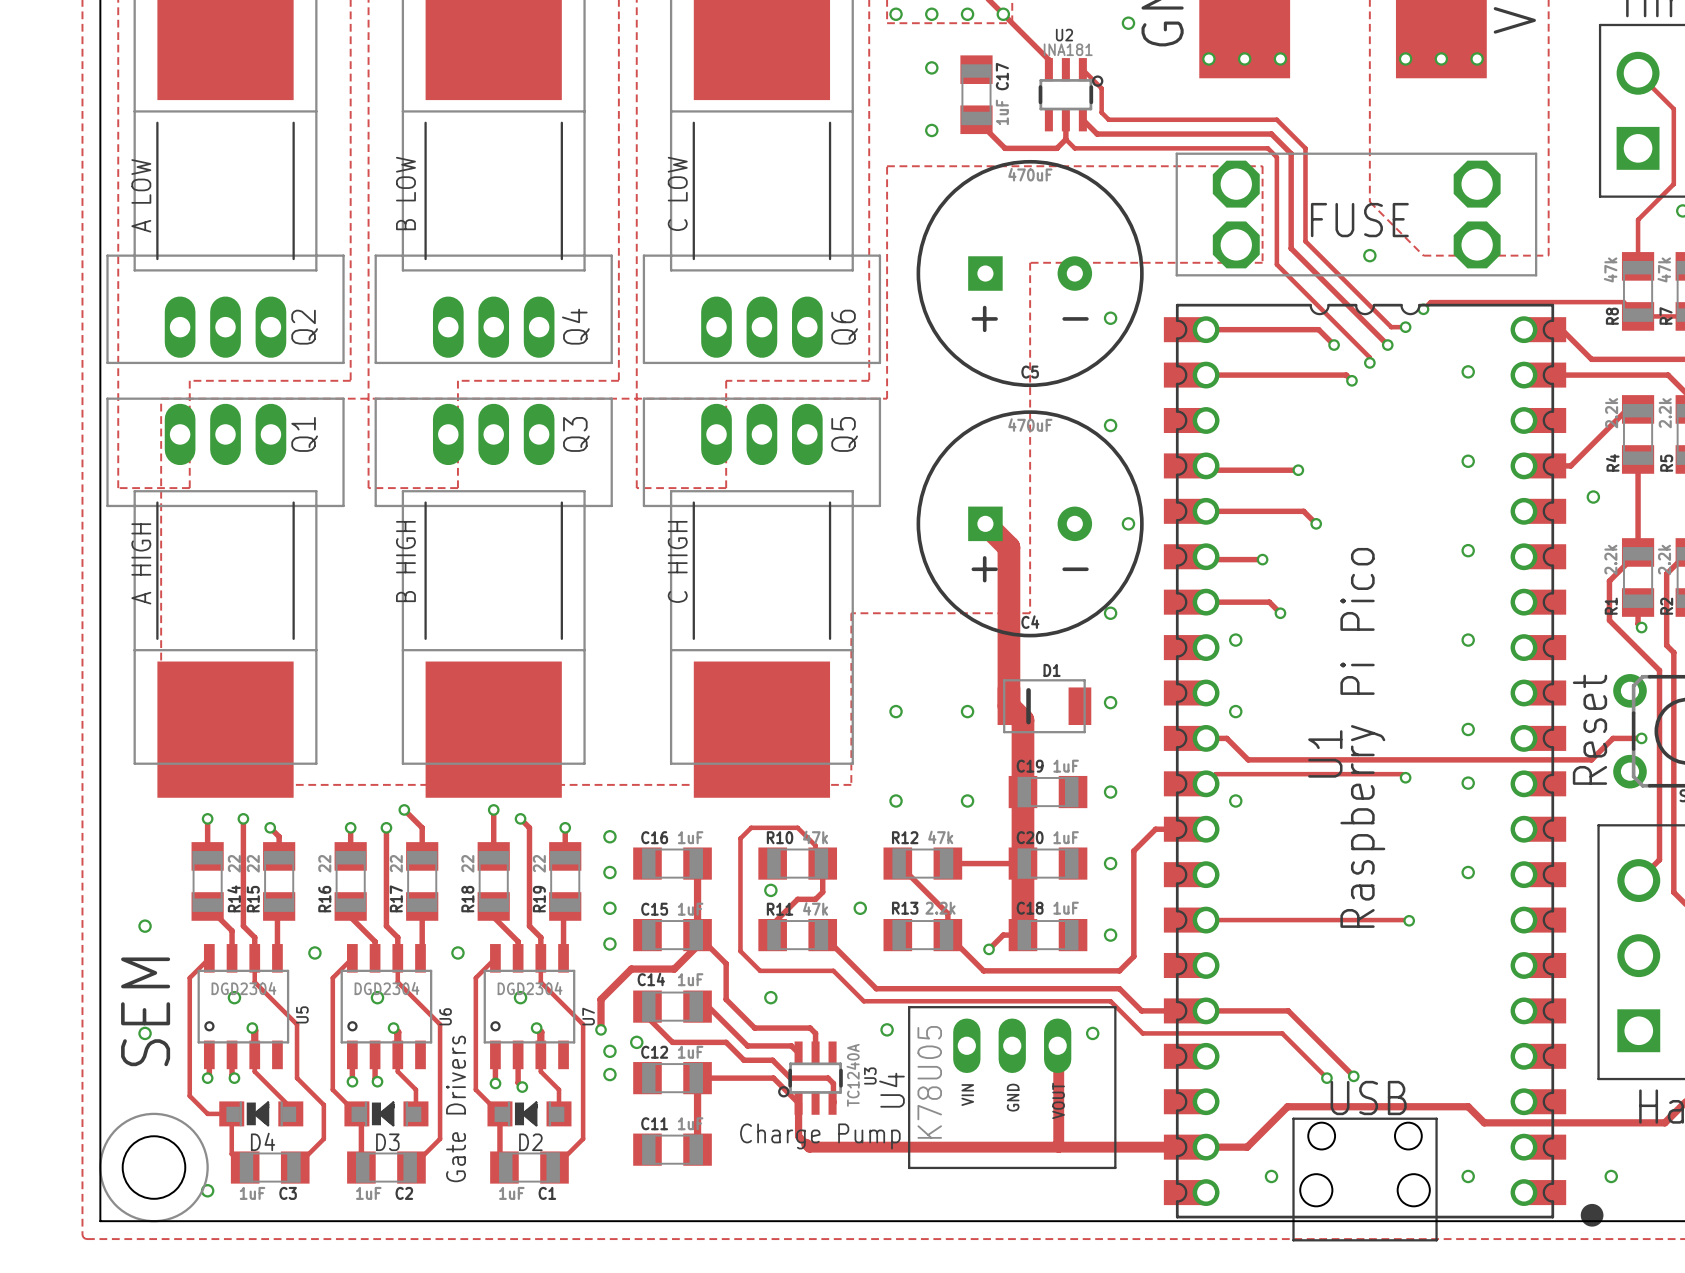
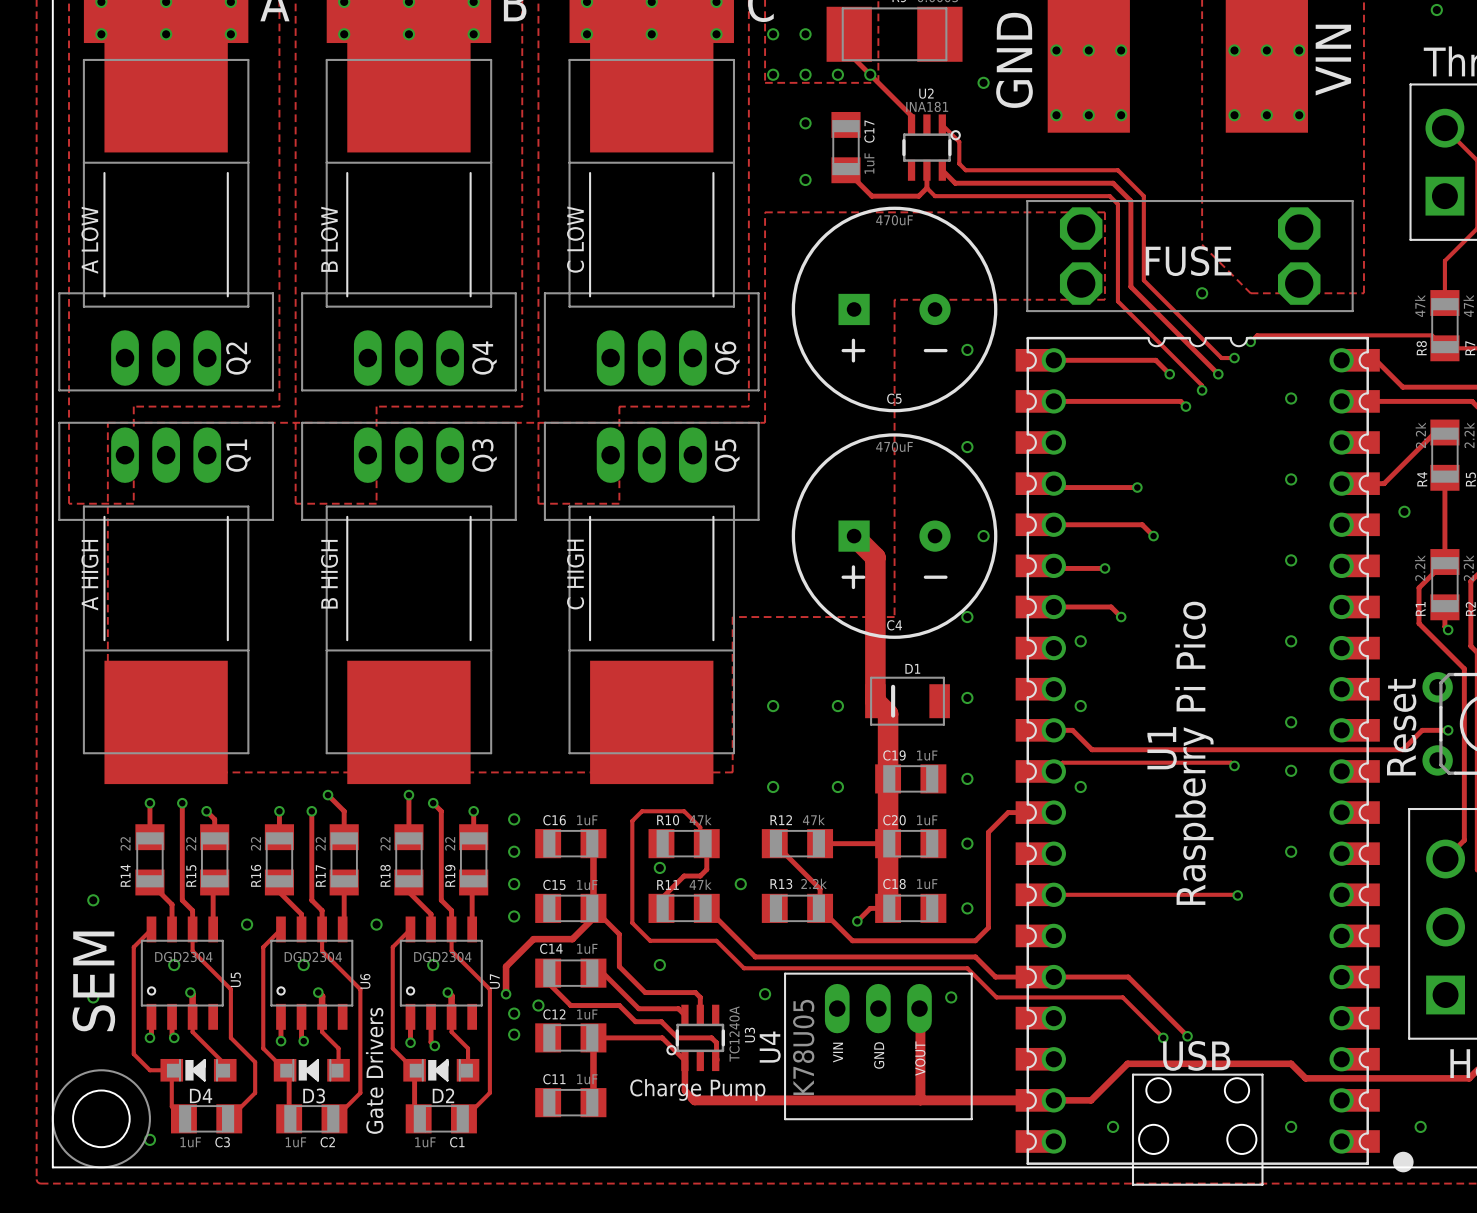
R14 value position: 22 (234, 863) -> 22 (125, 843)
R14 name position: R14 (234, 898) -> R14 (125, 875)

